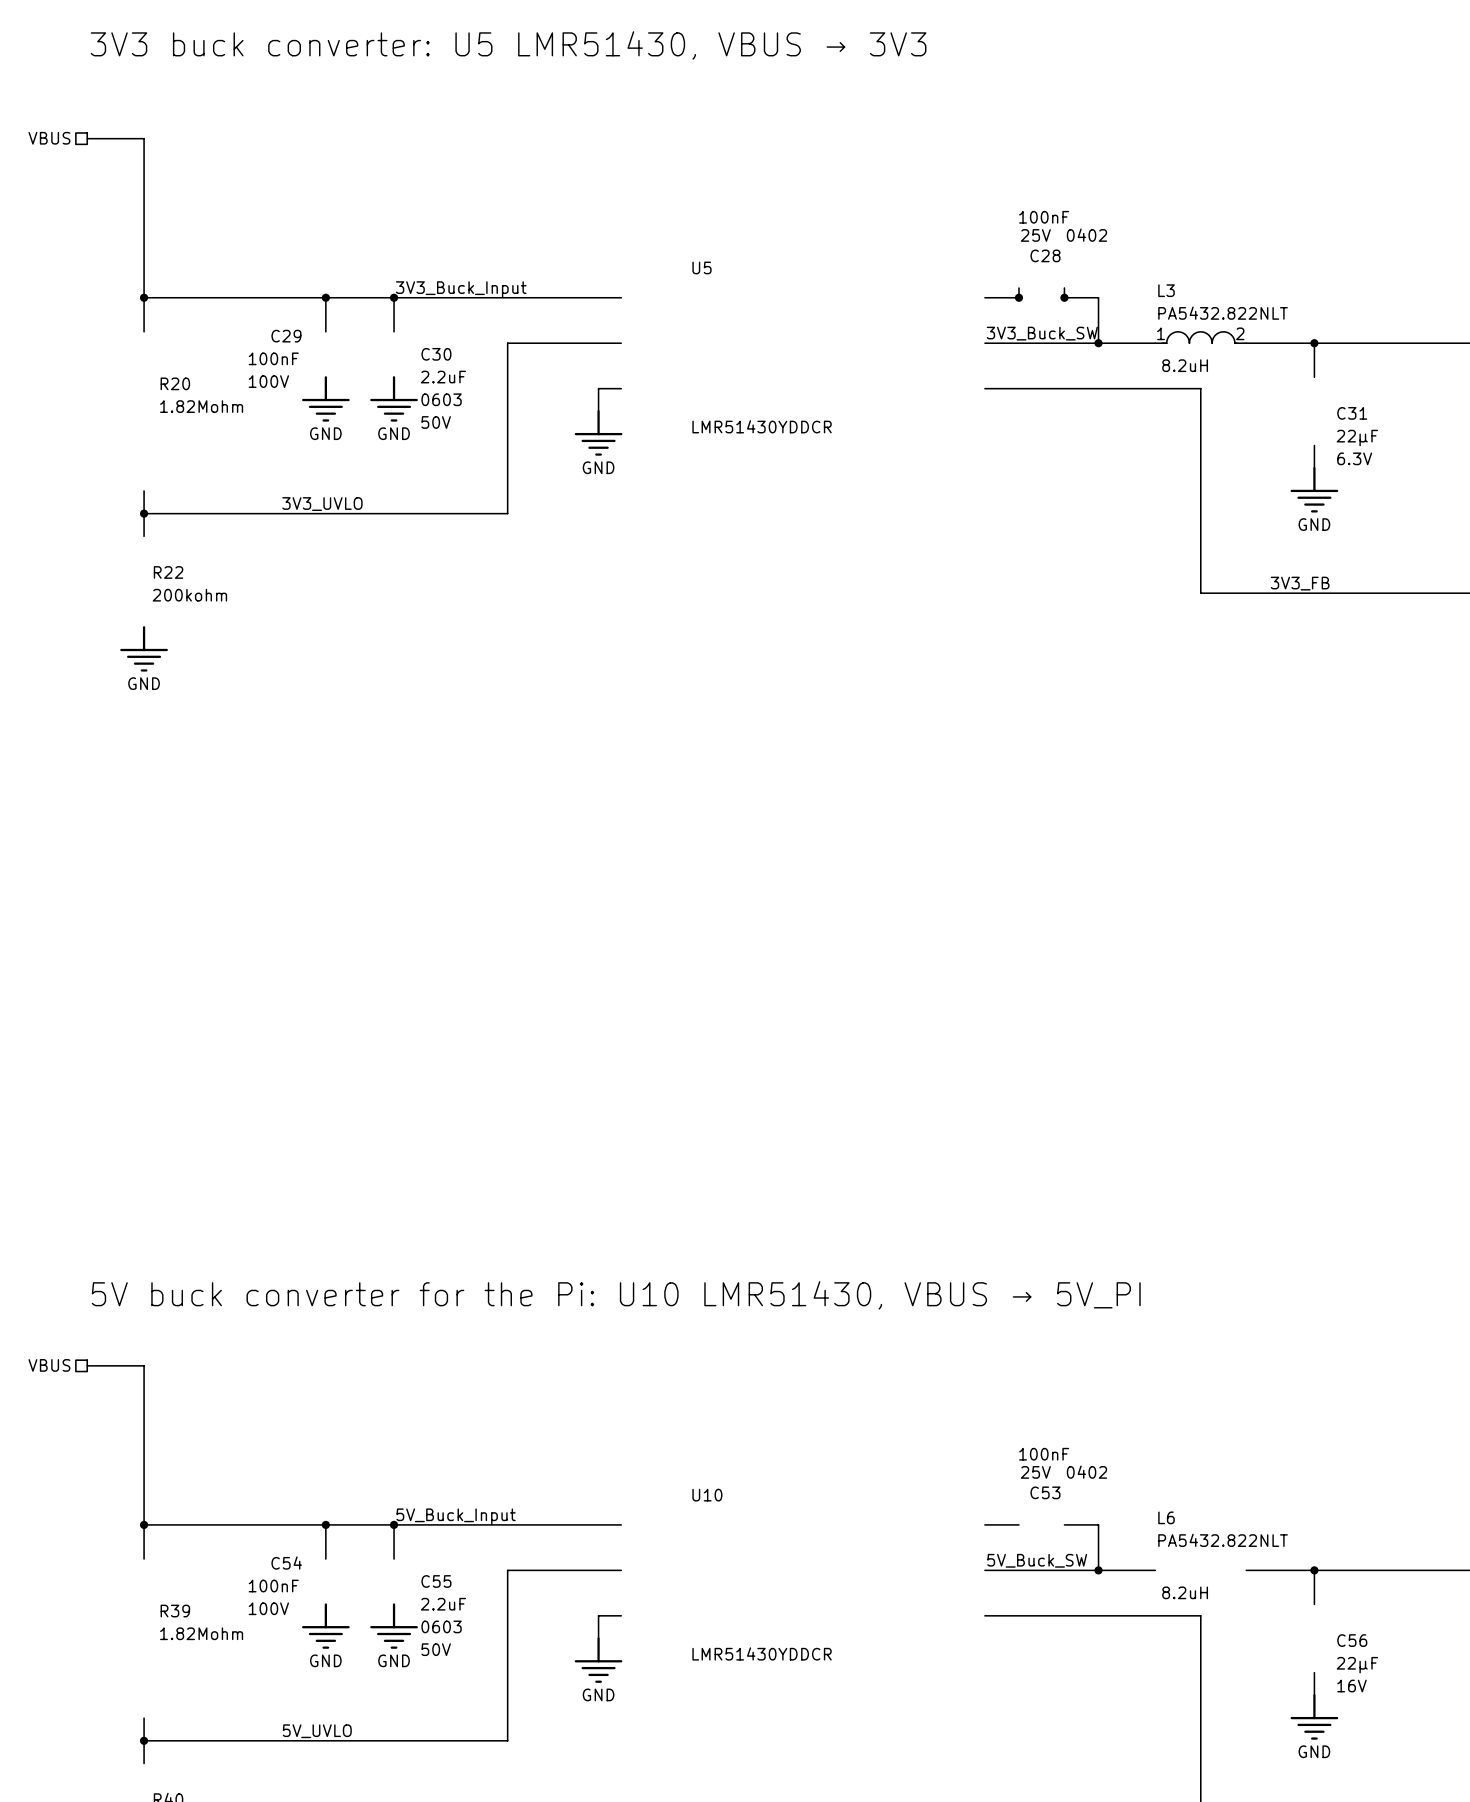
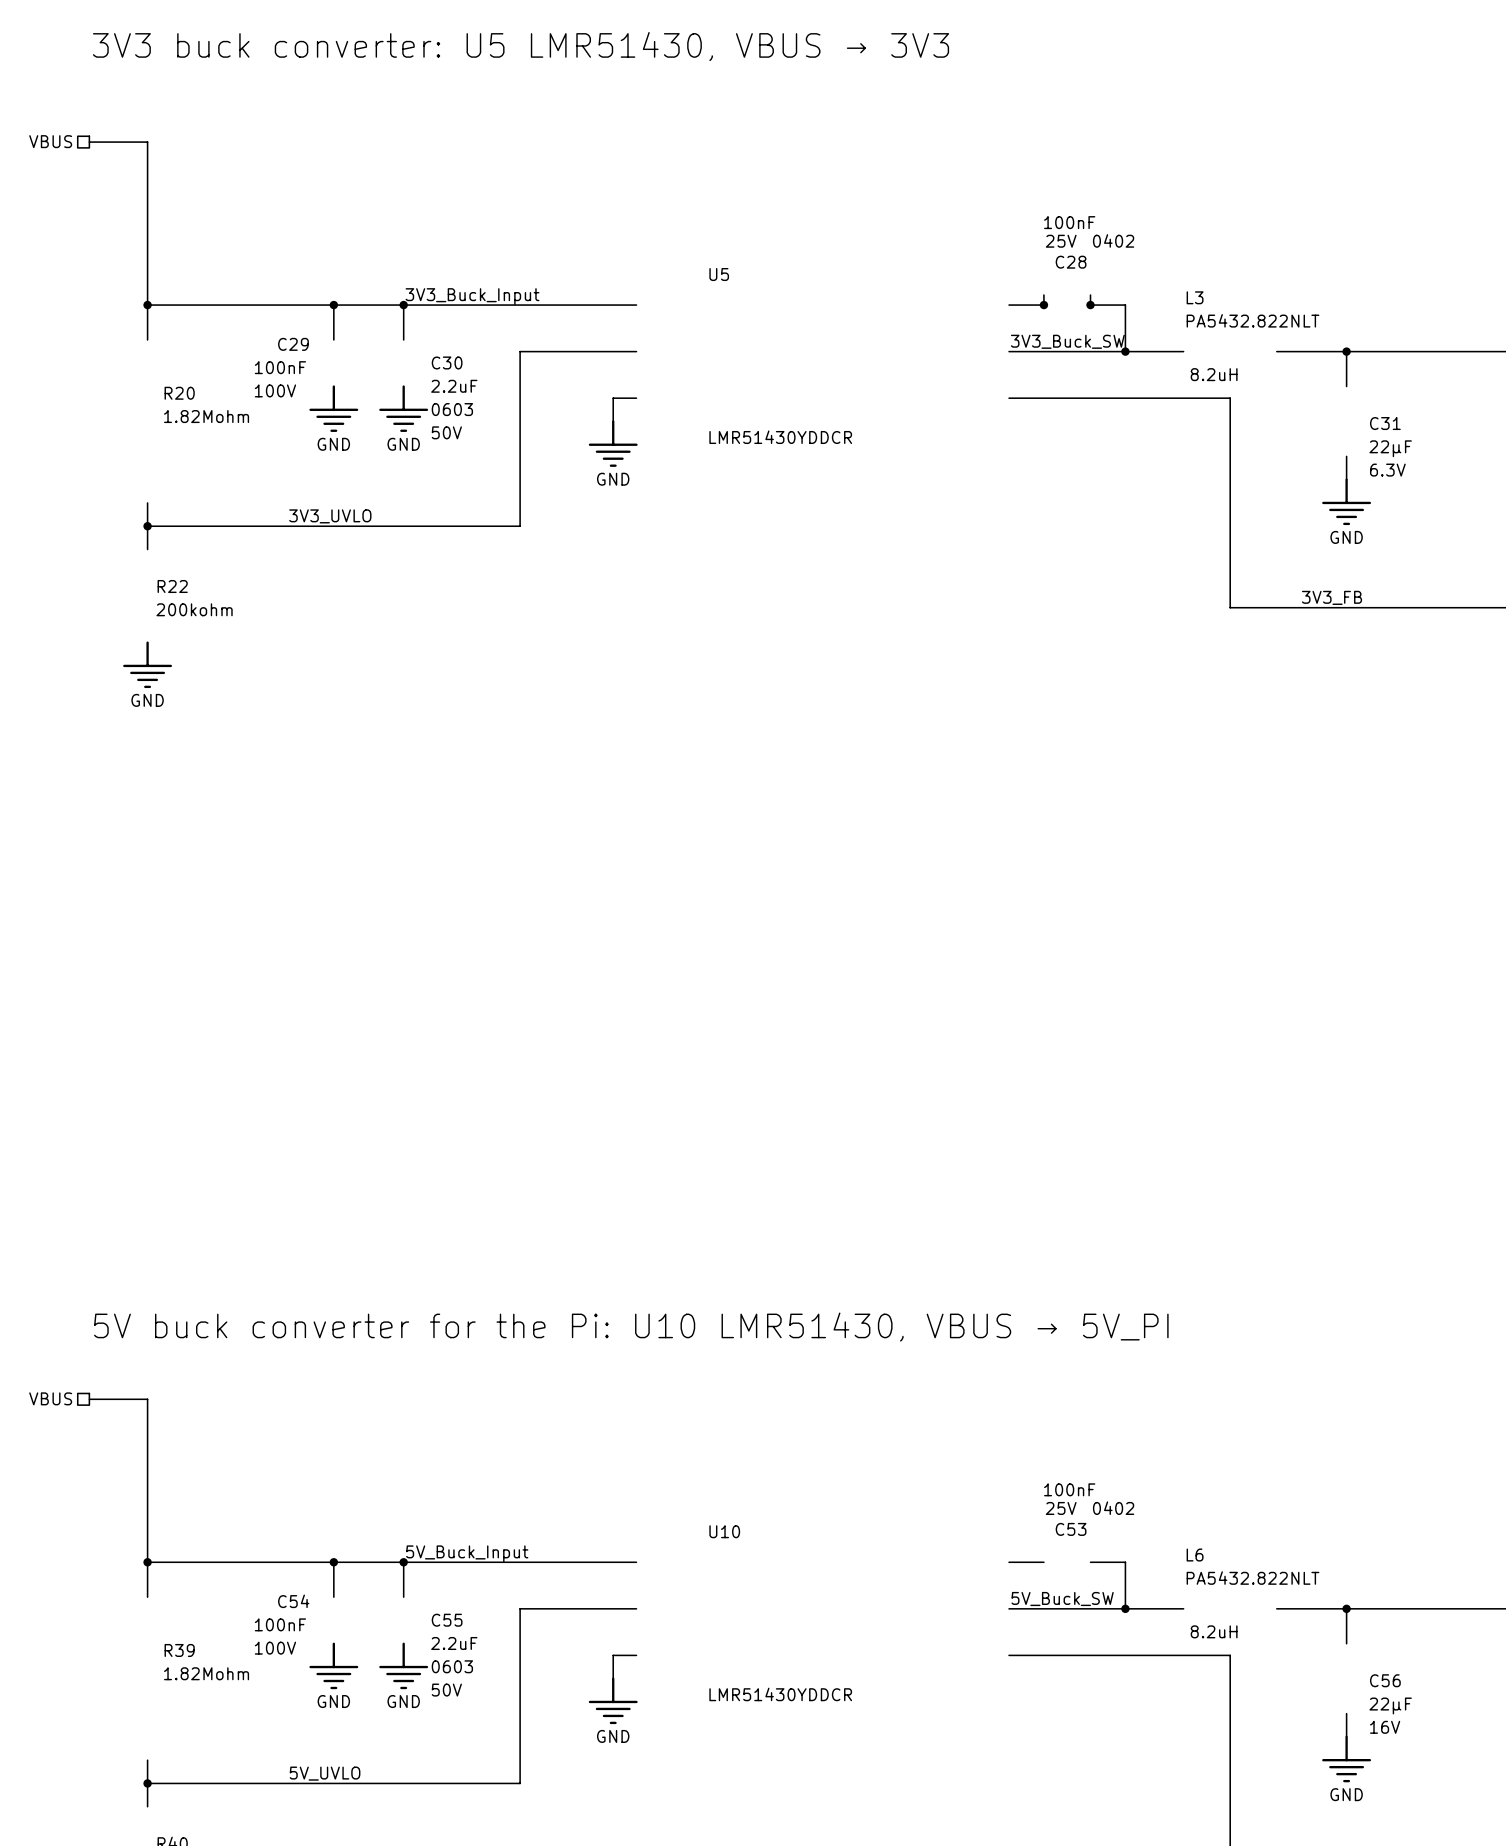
L3 symbol: [1155, 331, 1247, 344] -> [1186, 291, 1320, 382]

